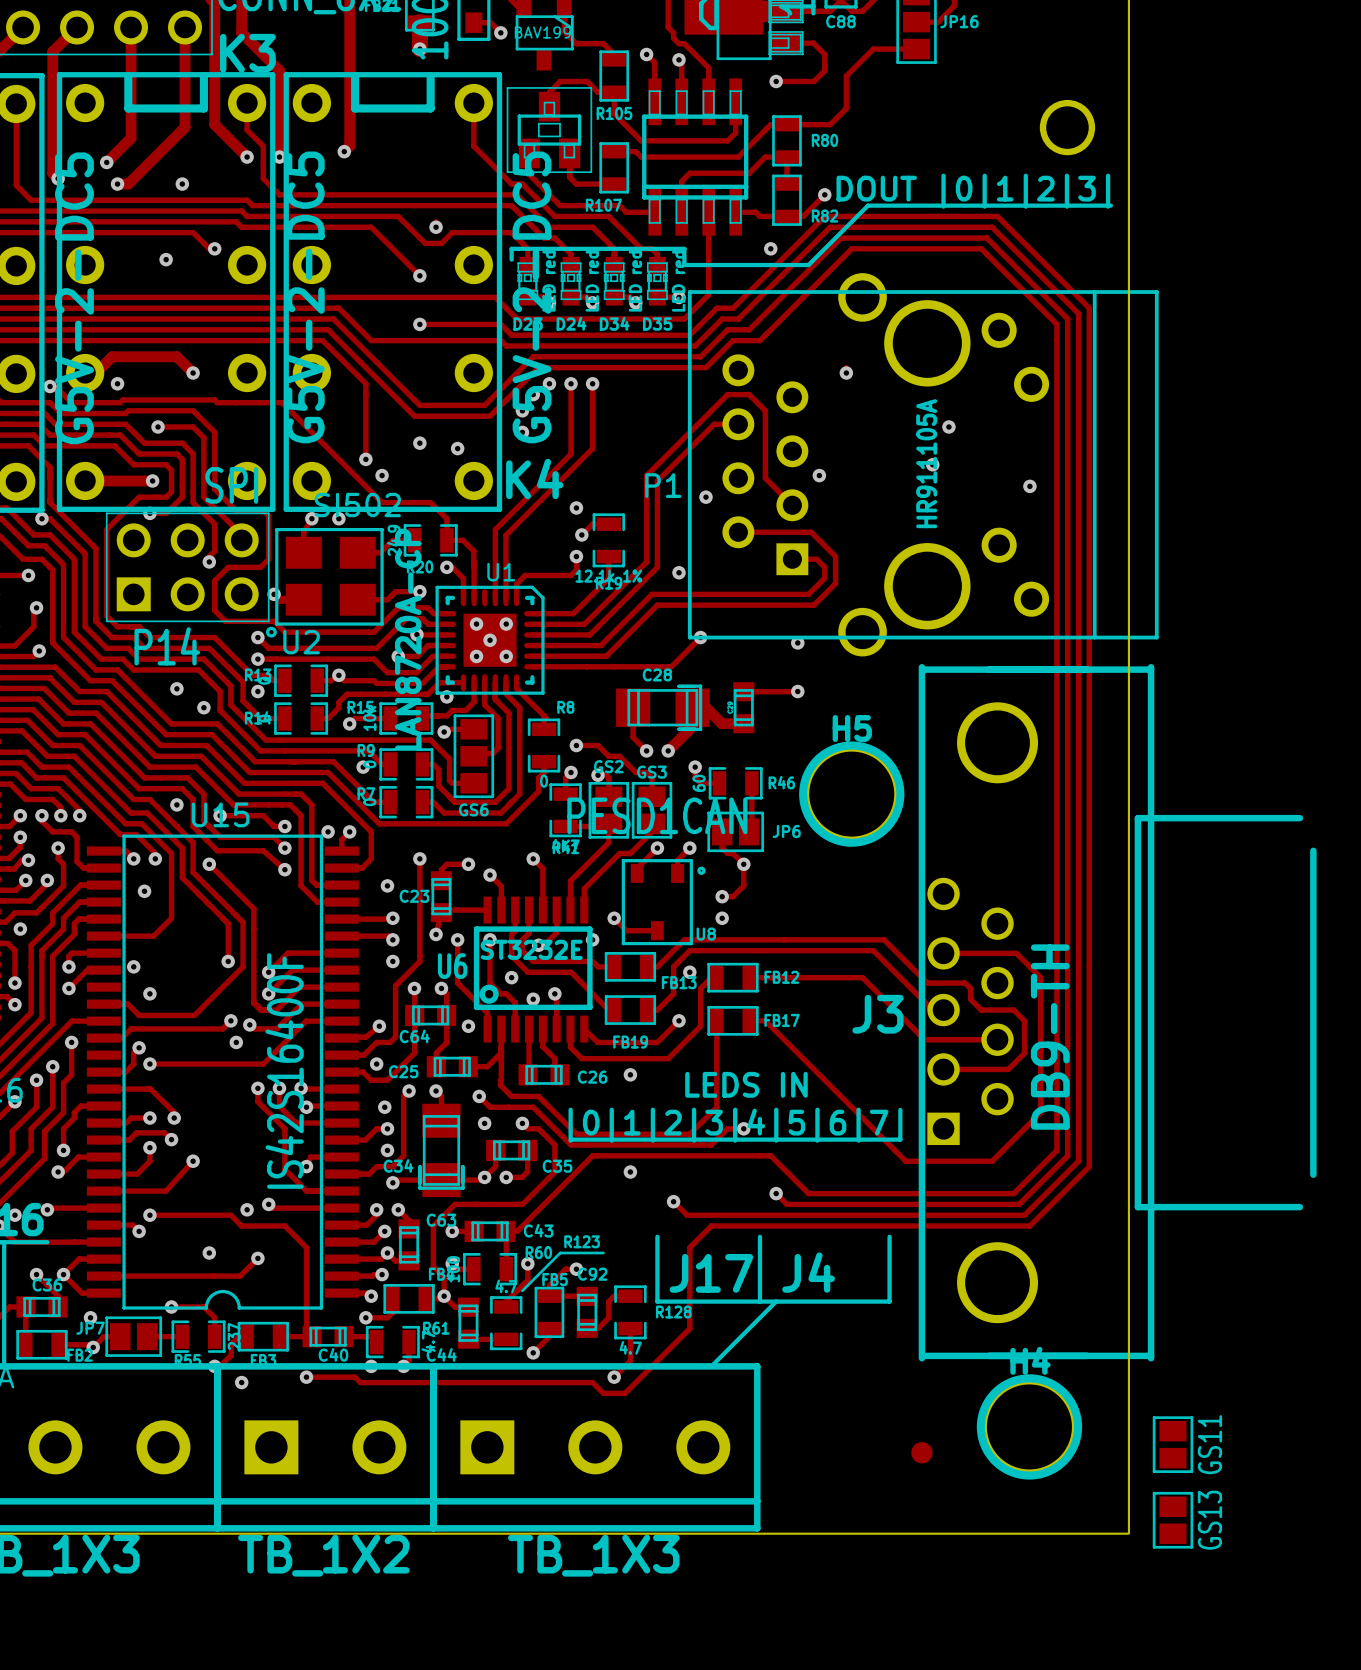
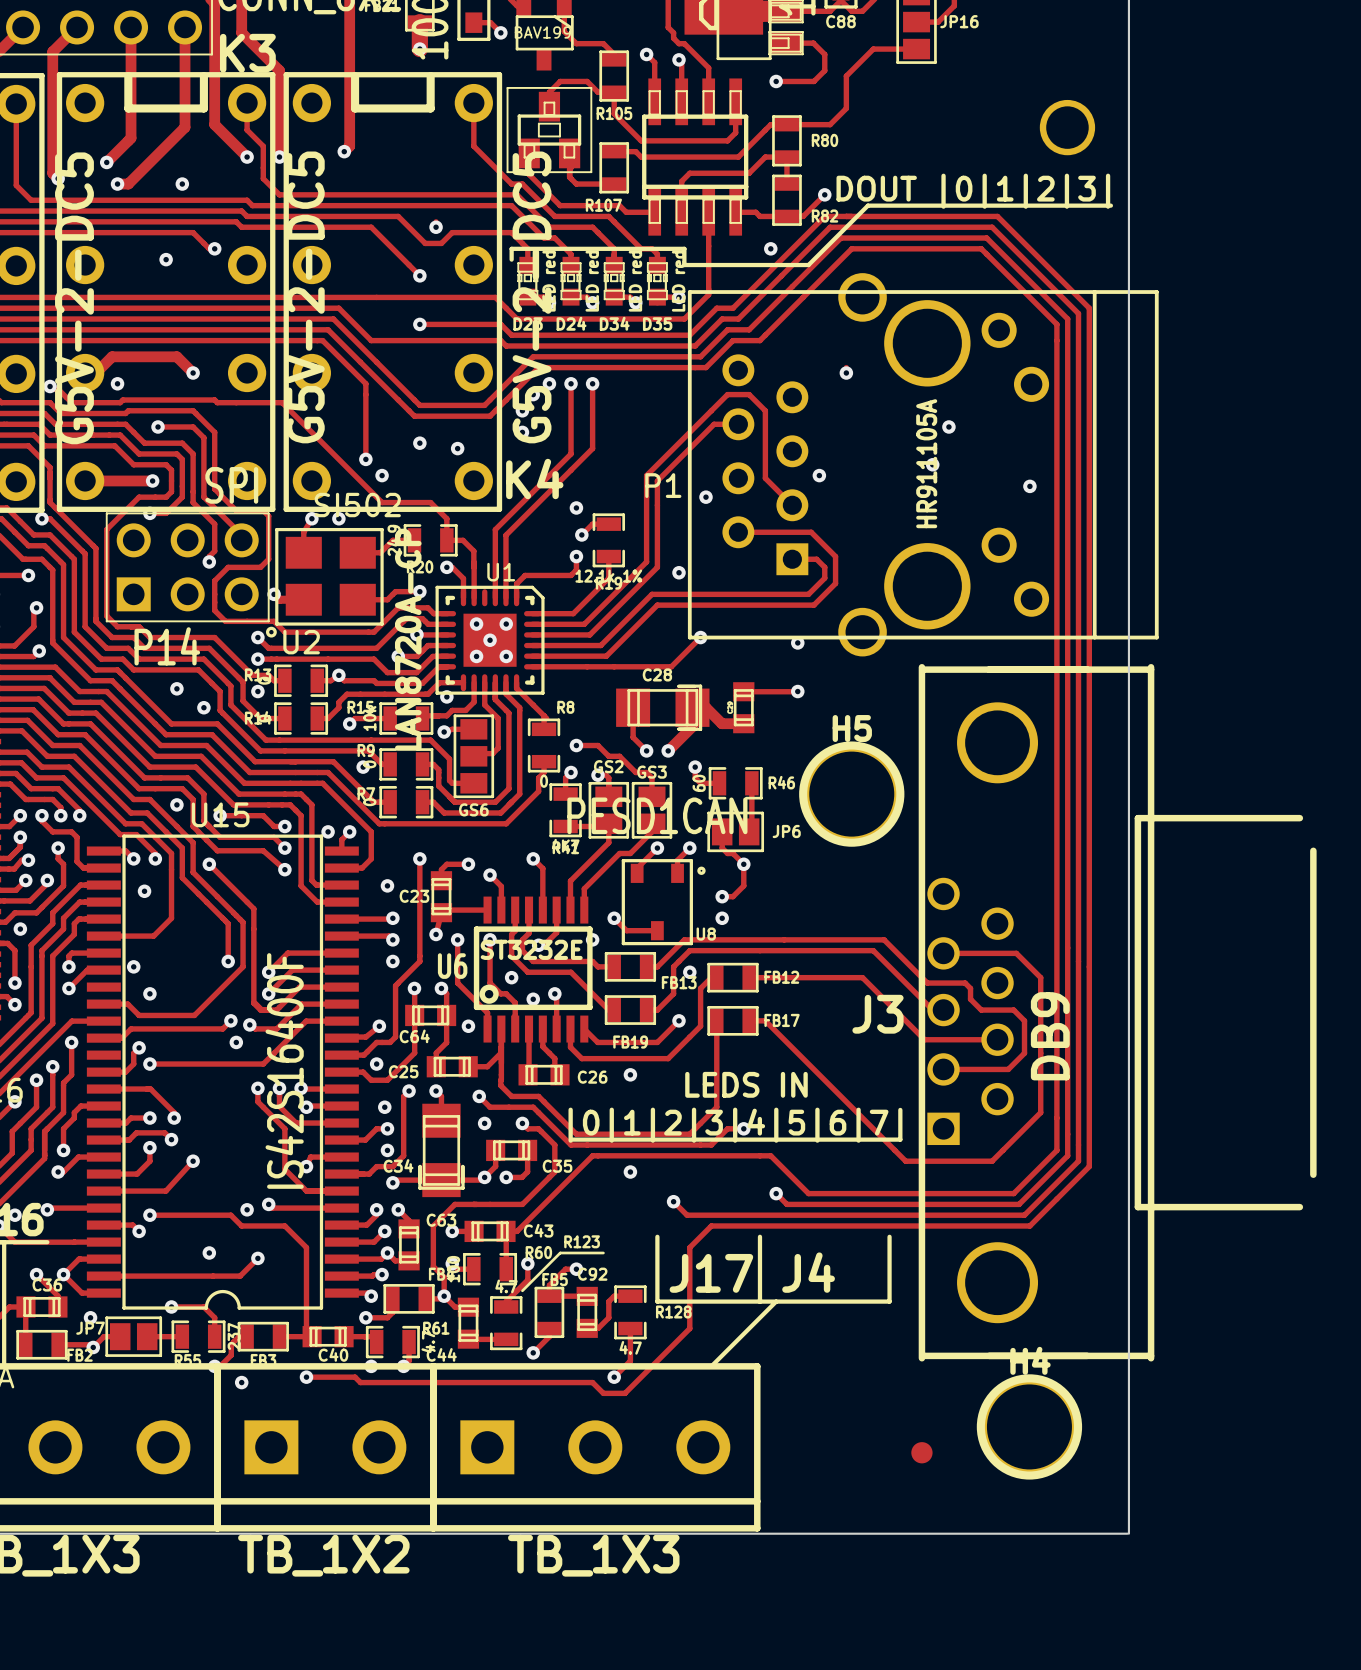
J3 value: DB9-TH (1050, 1037) -> DB9 (1050, 1036)
GS11: (1172, 1444) -> none
GS13: (1172, 1520) -> none

